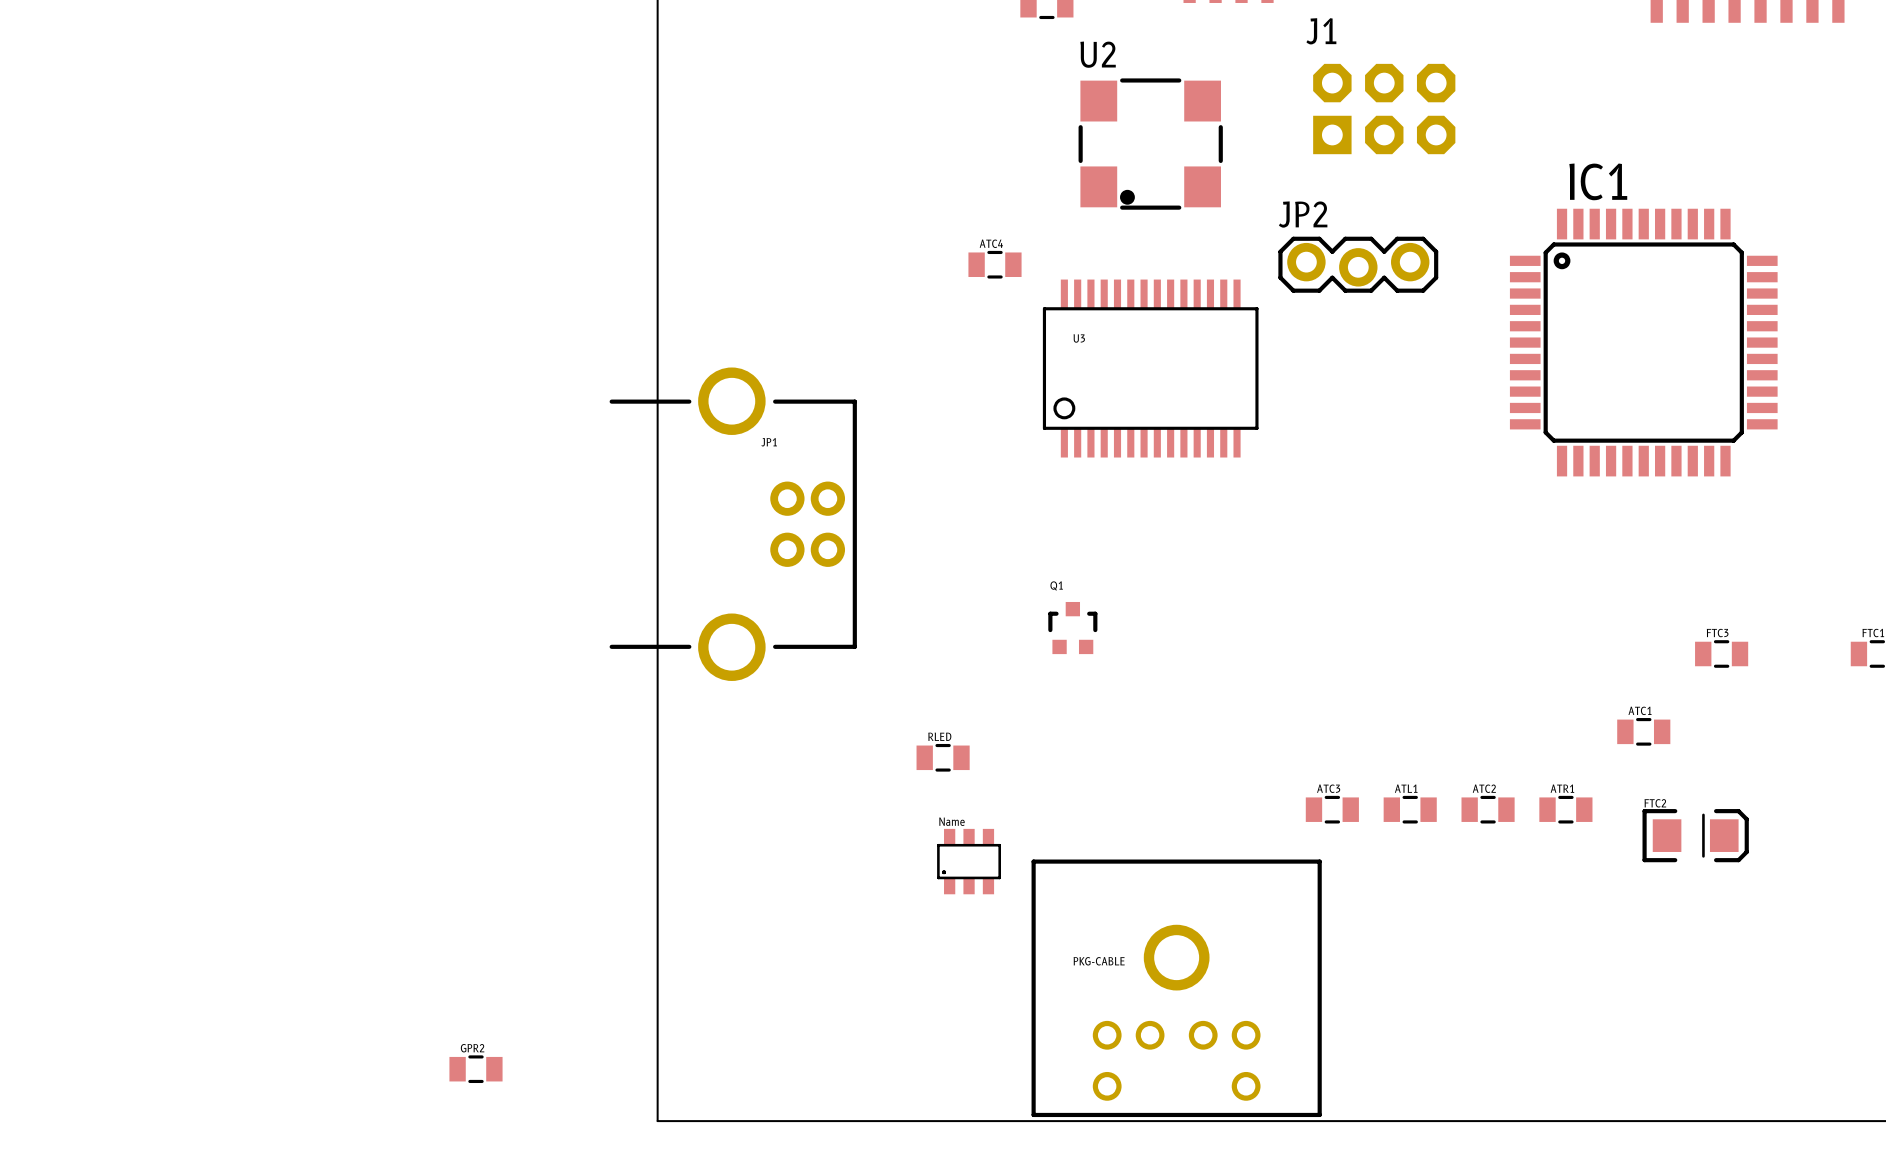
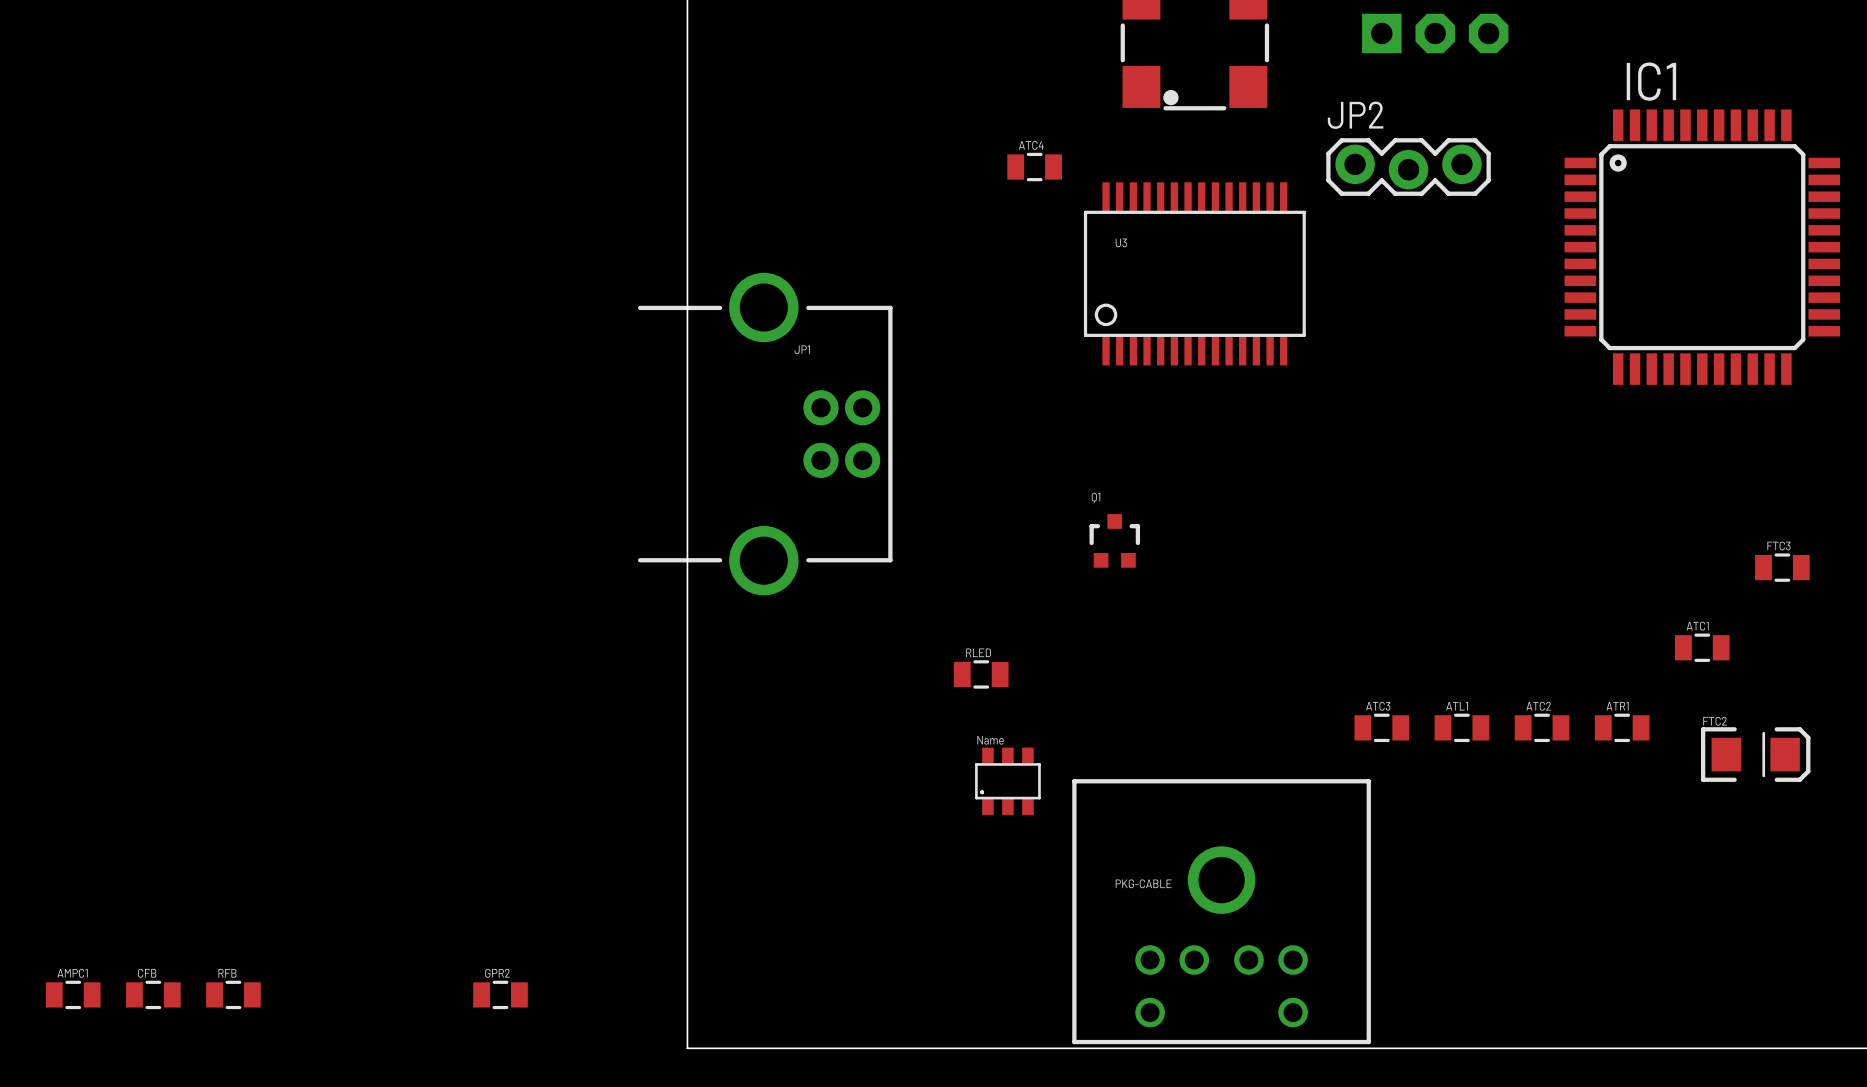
AMPC1: none -> (73, 994)
CFB: none -> (153, 994)
RFB: none -> (233, 994)

